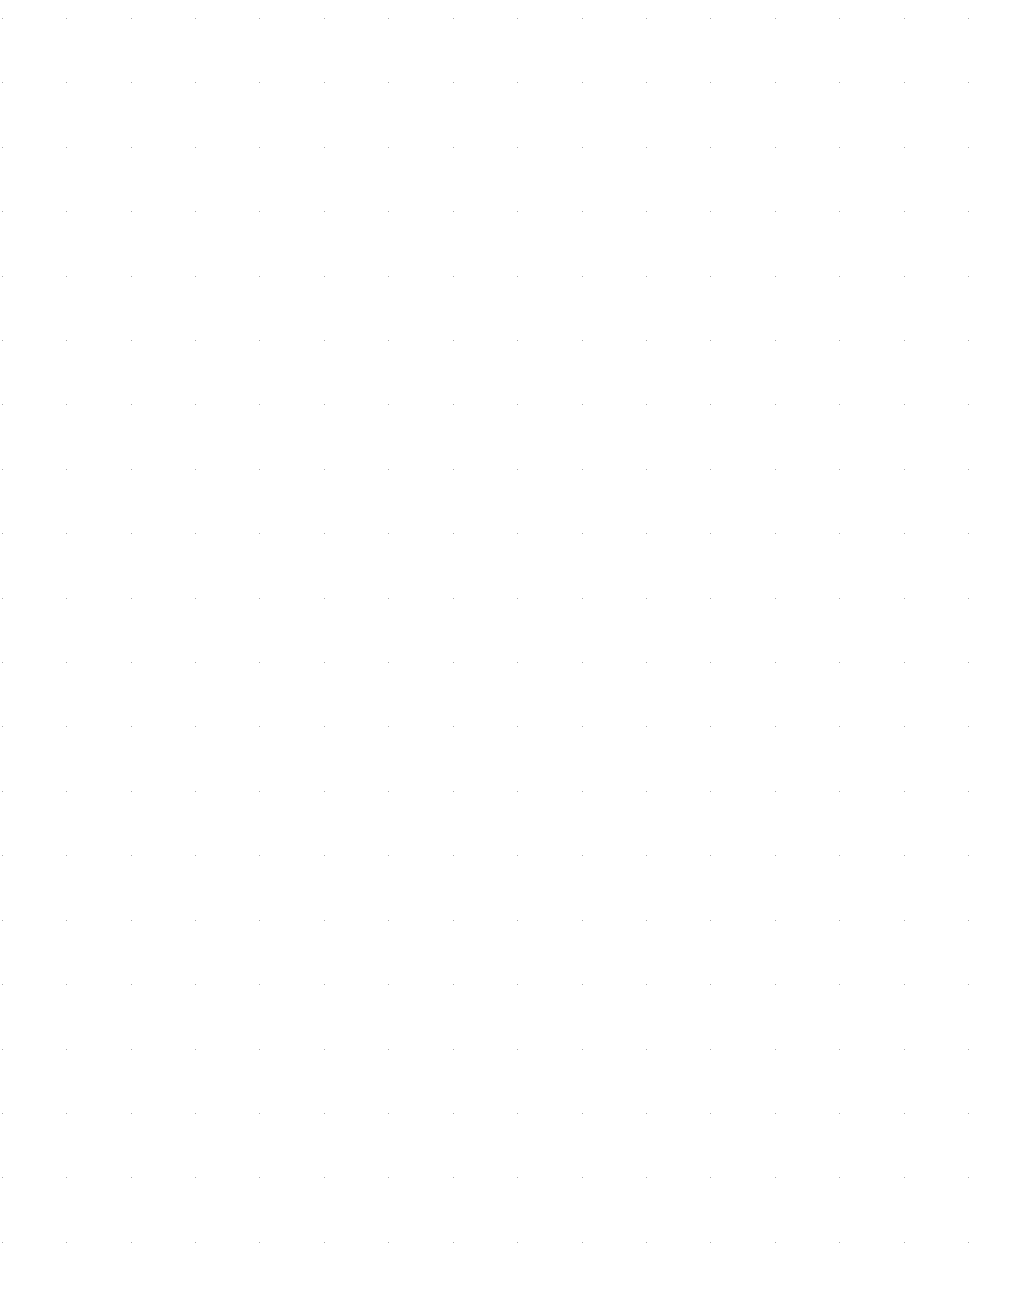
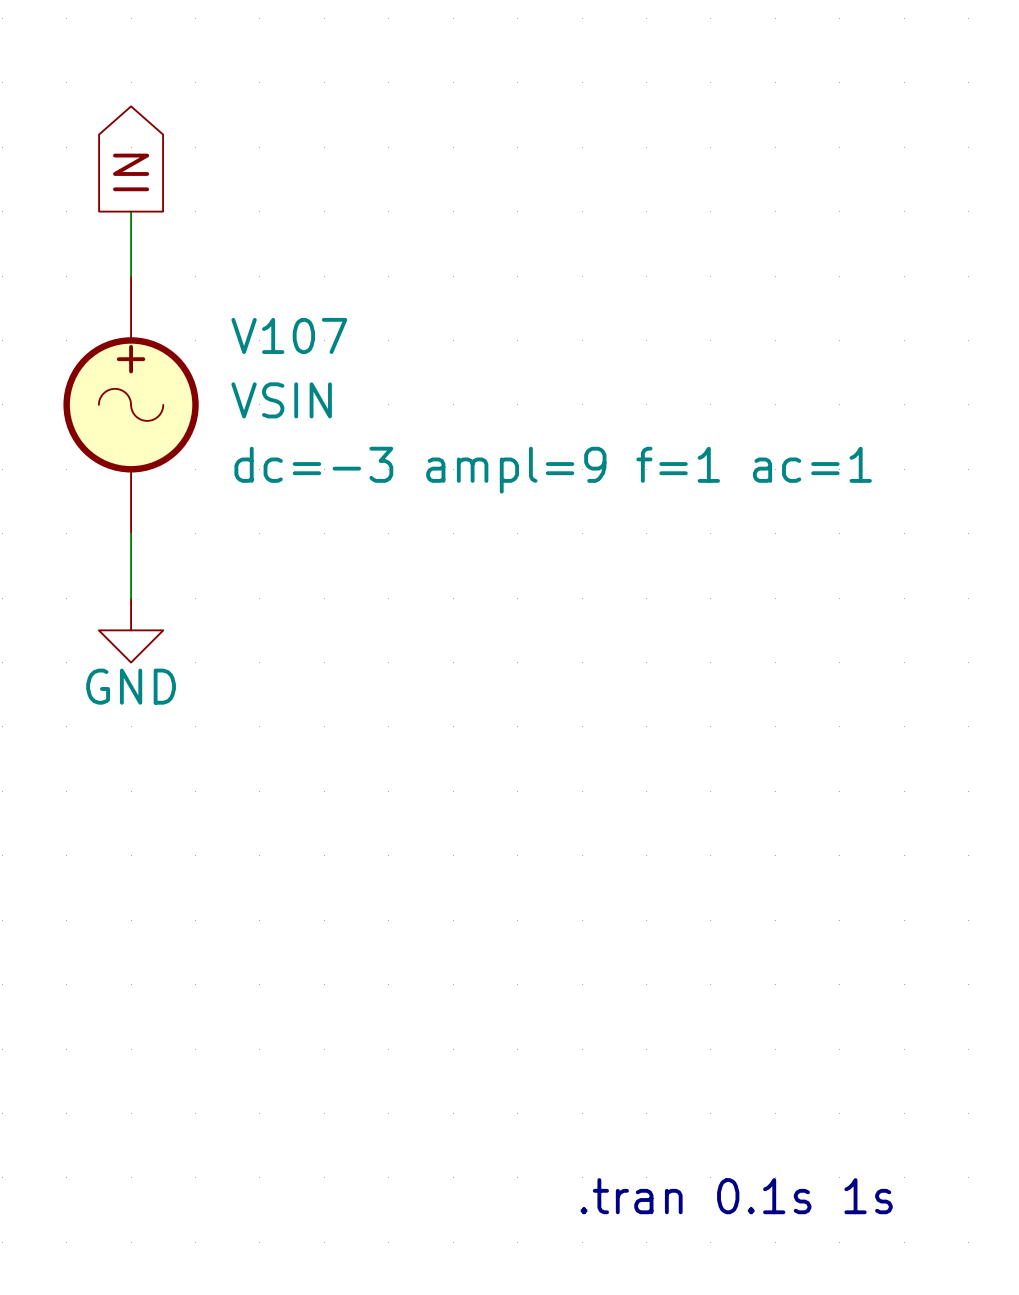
global label: none -> IN (131, 172)
wire: none -> (131, 211) (131, 276)
V107: none -> VSIN (131, 404)
wire: none -> (131, 533) (131, 598)
power symbol: none -> GND (131, 630)
text: none -> .tran 0.1s 1s (736, 1196)

